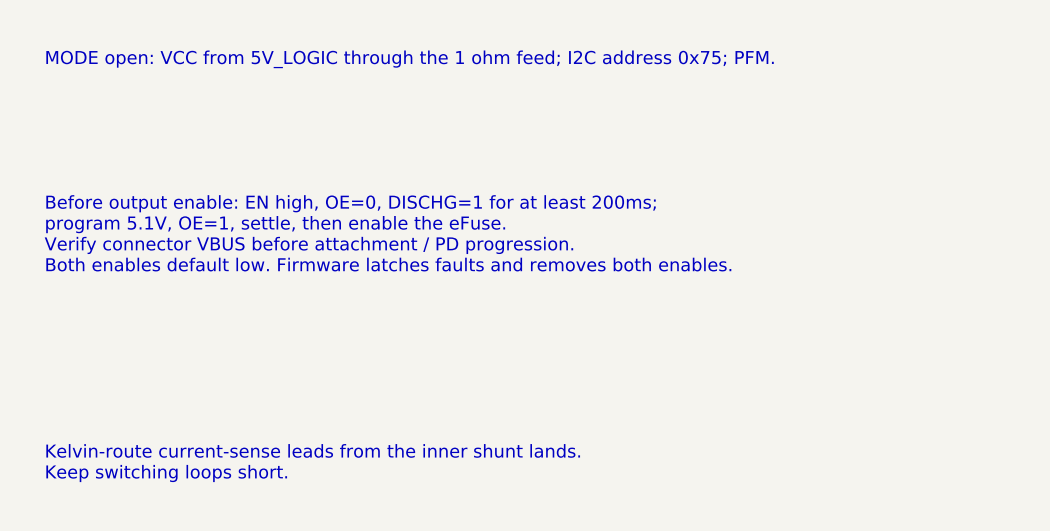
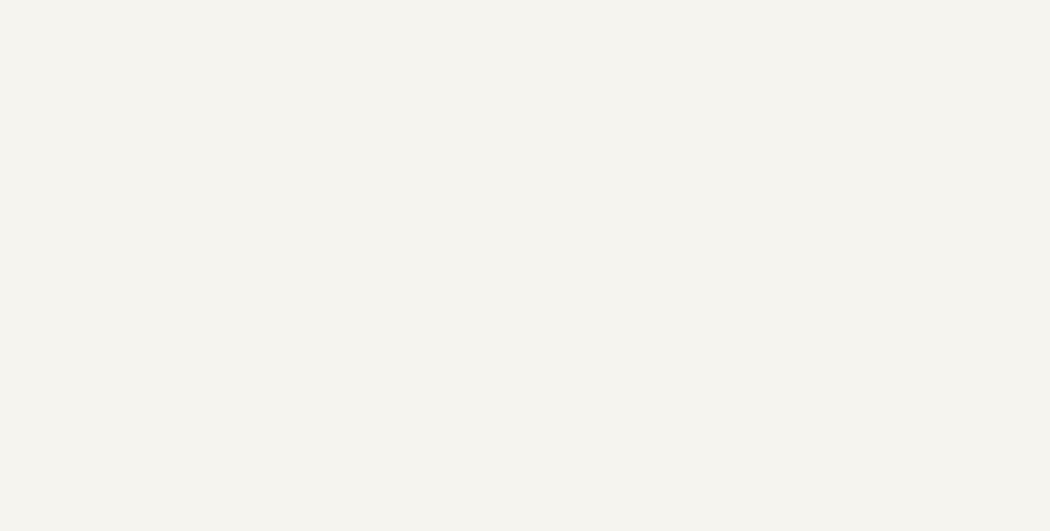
text: MODE open: VCC from 5V_LOGIC through the 1 ohm feed; I2C address 0x75; PFM. (410, 59) -> none
text: Before output enable: EN high, OE=0, DISCHG=1 for at least 200ms; (351, 203) -> none
text: program 5.1V, OE=1, settle, then enable the eFuse. (275, 224) -> none
text: Verify connector VBUS before attachment / PD progression. (308, 245) -> none
text: Both enables default low. Firmware latches faults and removes both enables. (388, 264) -> none
text: Kelvin-route current-sense leads from the inner shunt lands. (313, 450) -> none
text: Keep switching loops short. (166, 473) -> none

